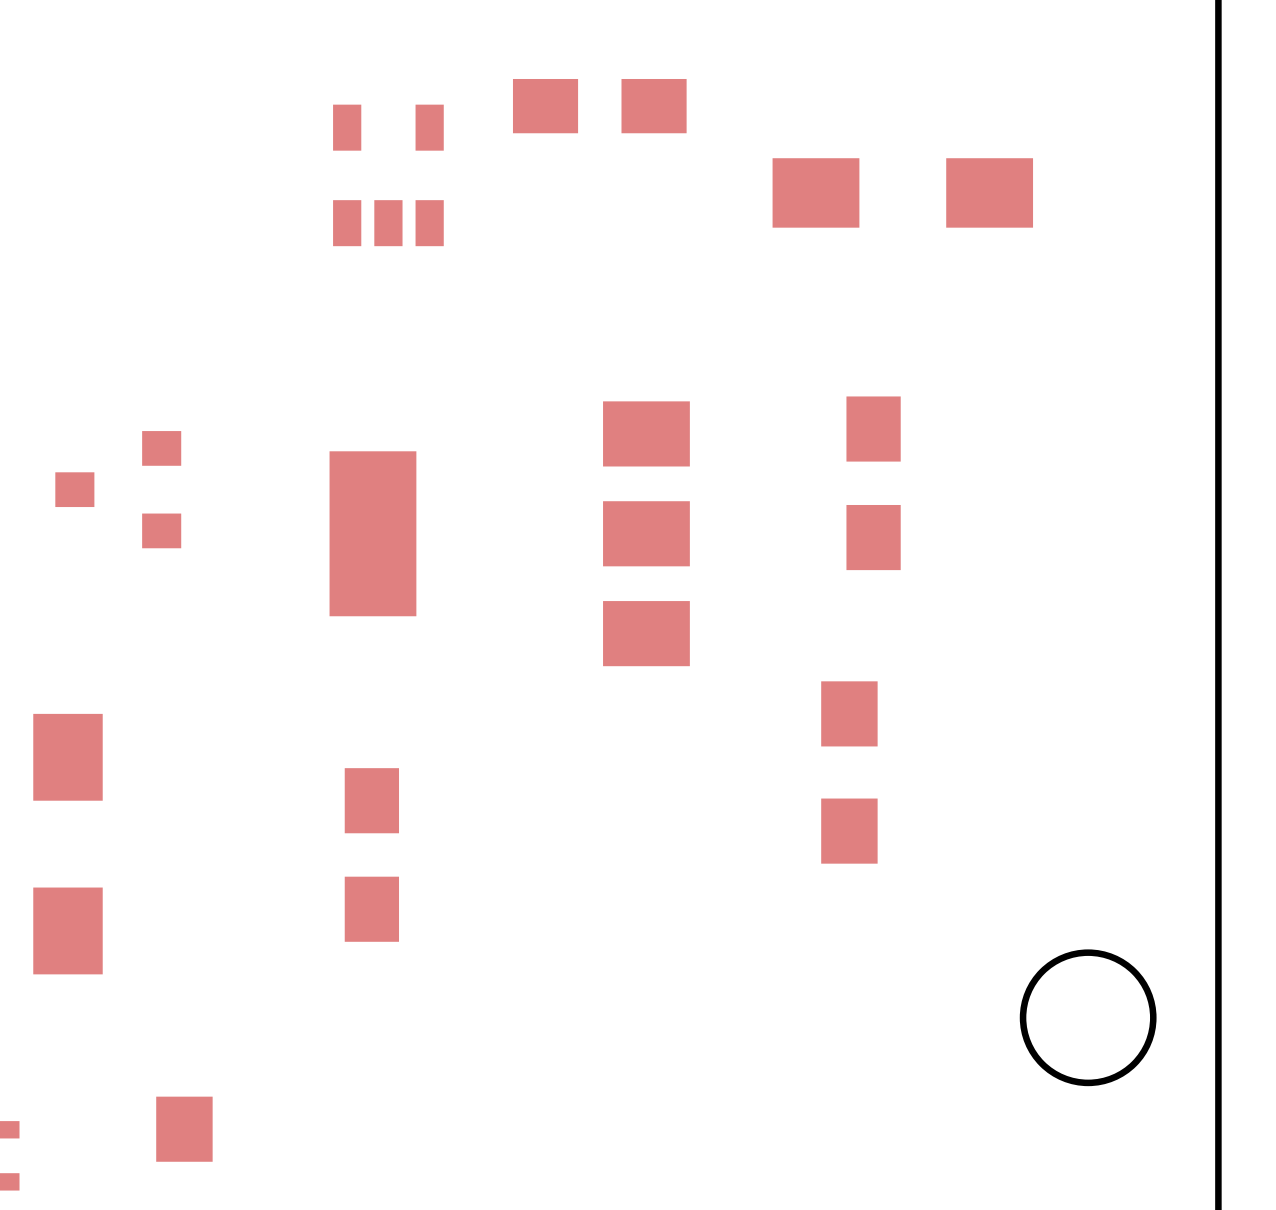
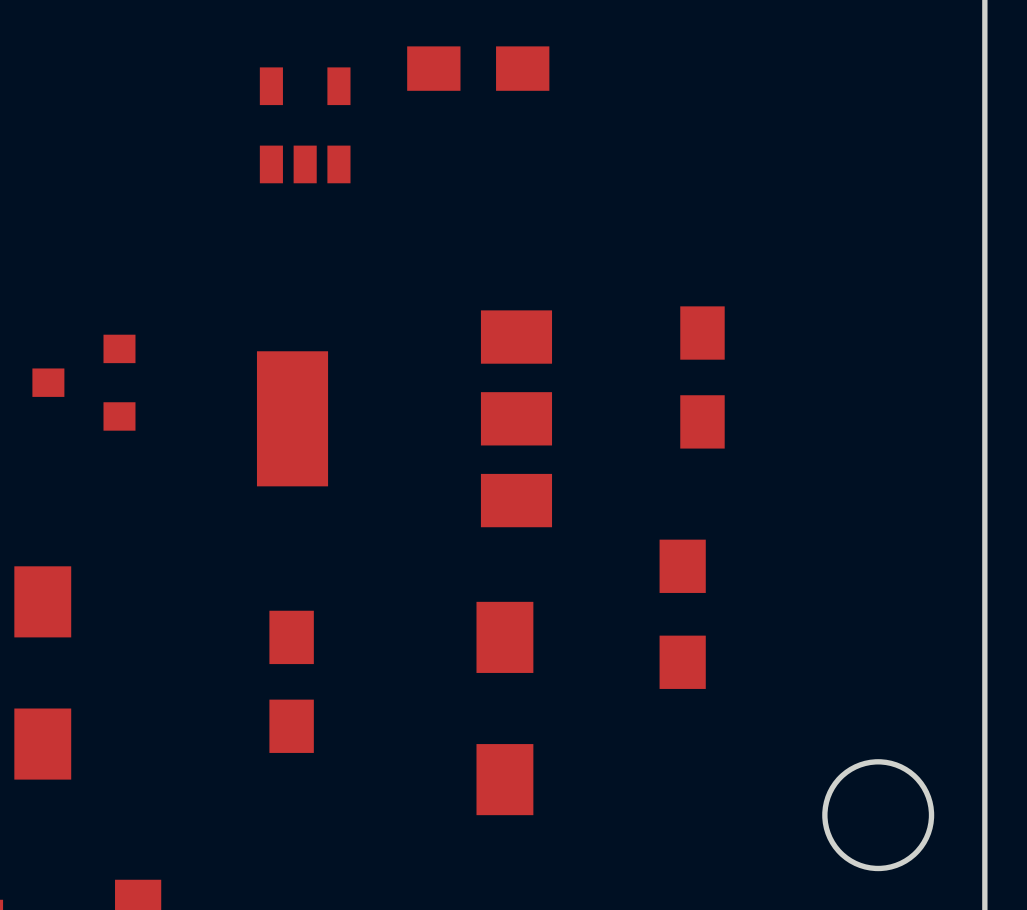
part rotation: 0° (902, 192) -> 90° clockwise (504, 708)
part position: (902, 192) -> (504, 708)

